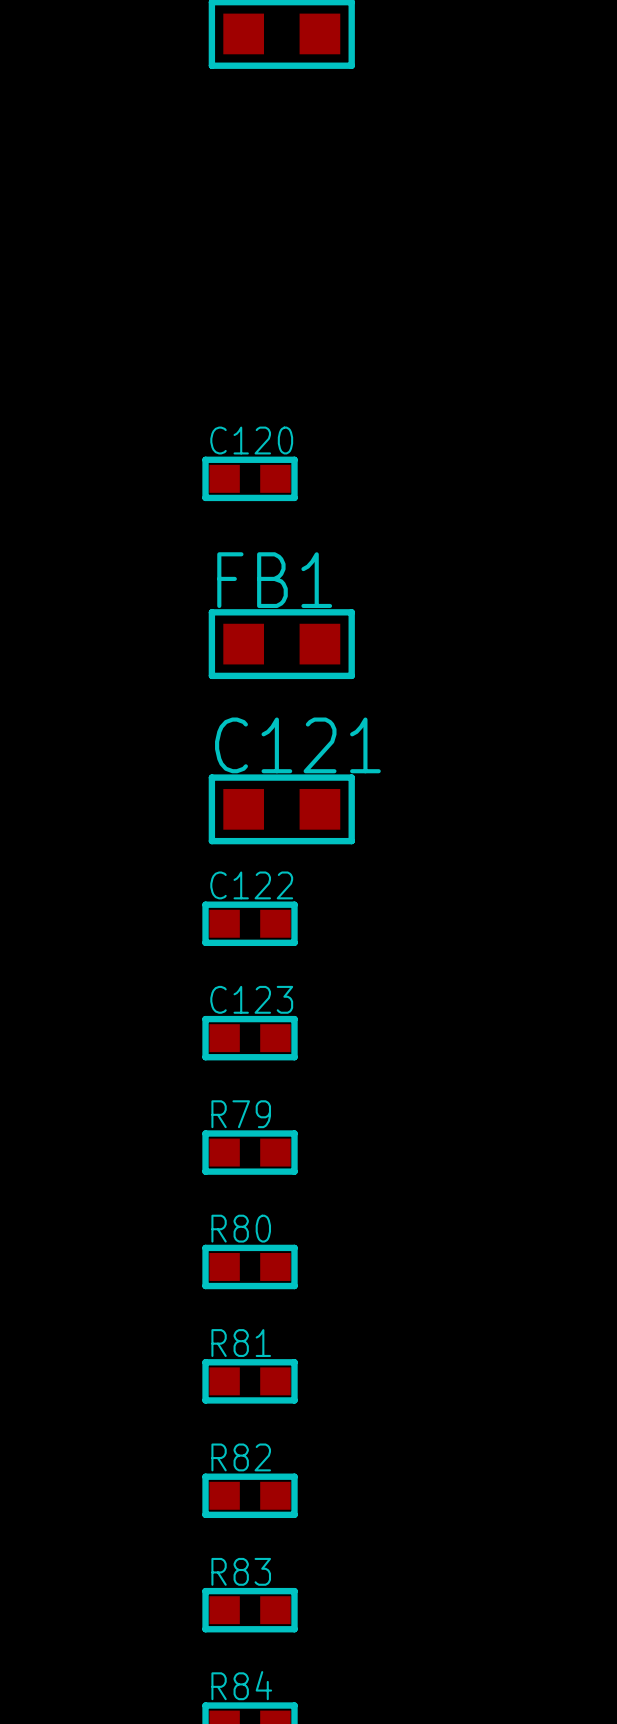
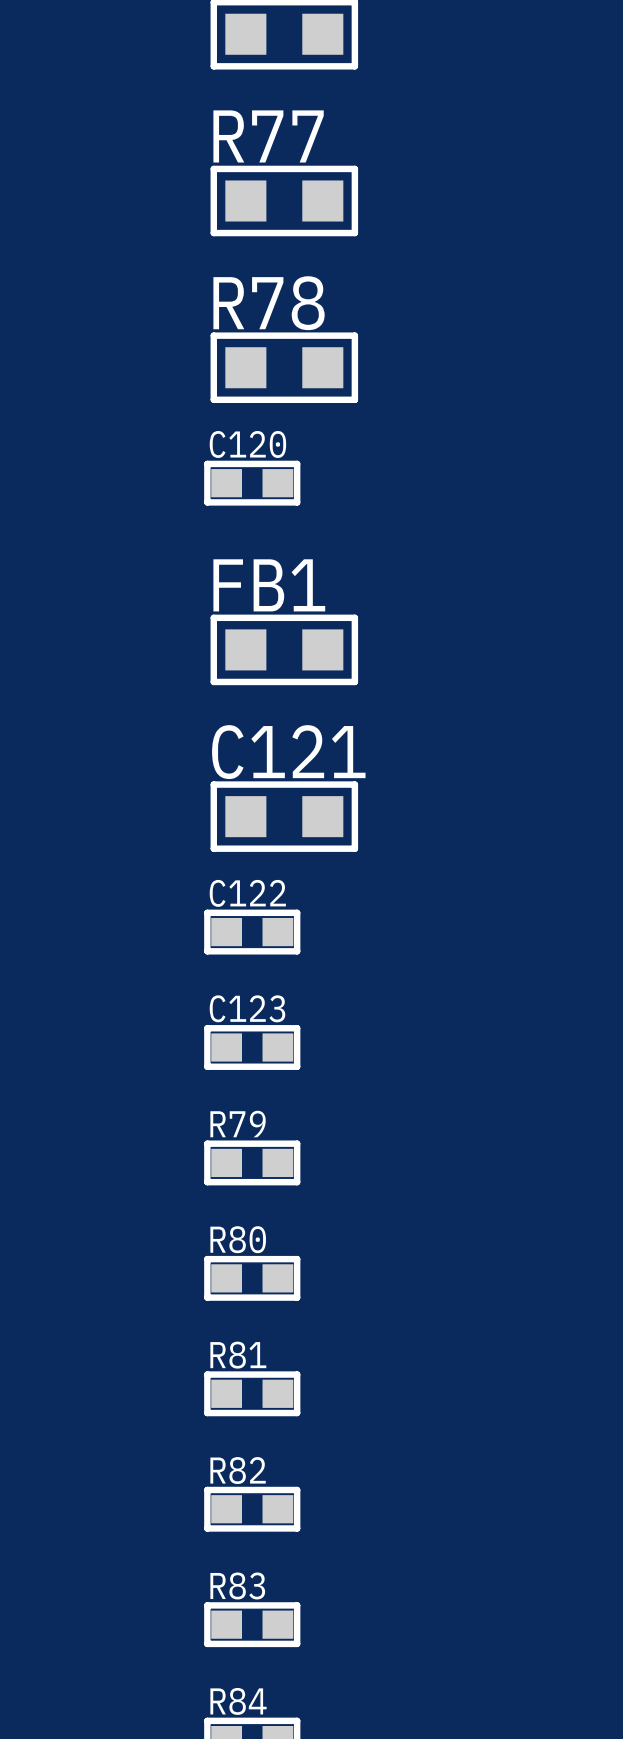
R77: none -> (284, 200)
R78: none -> (284, 367)

